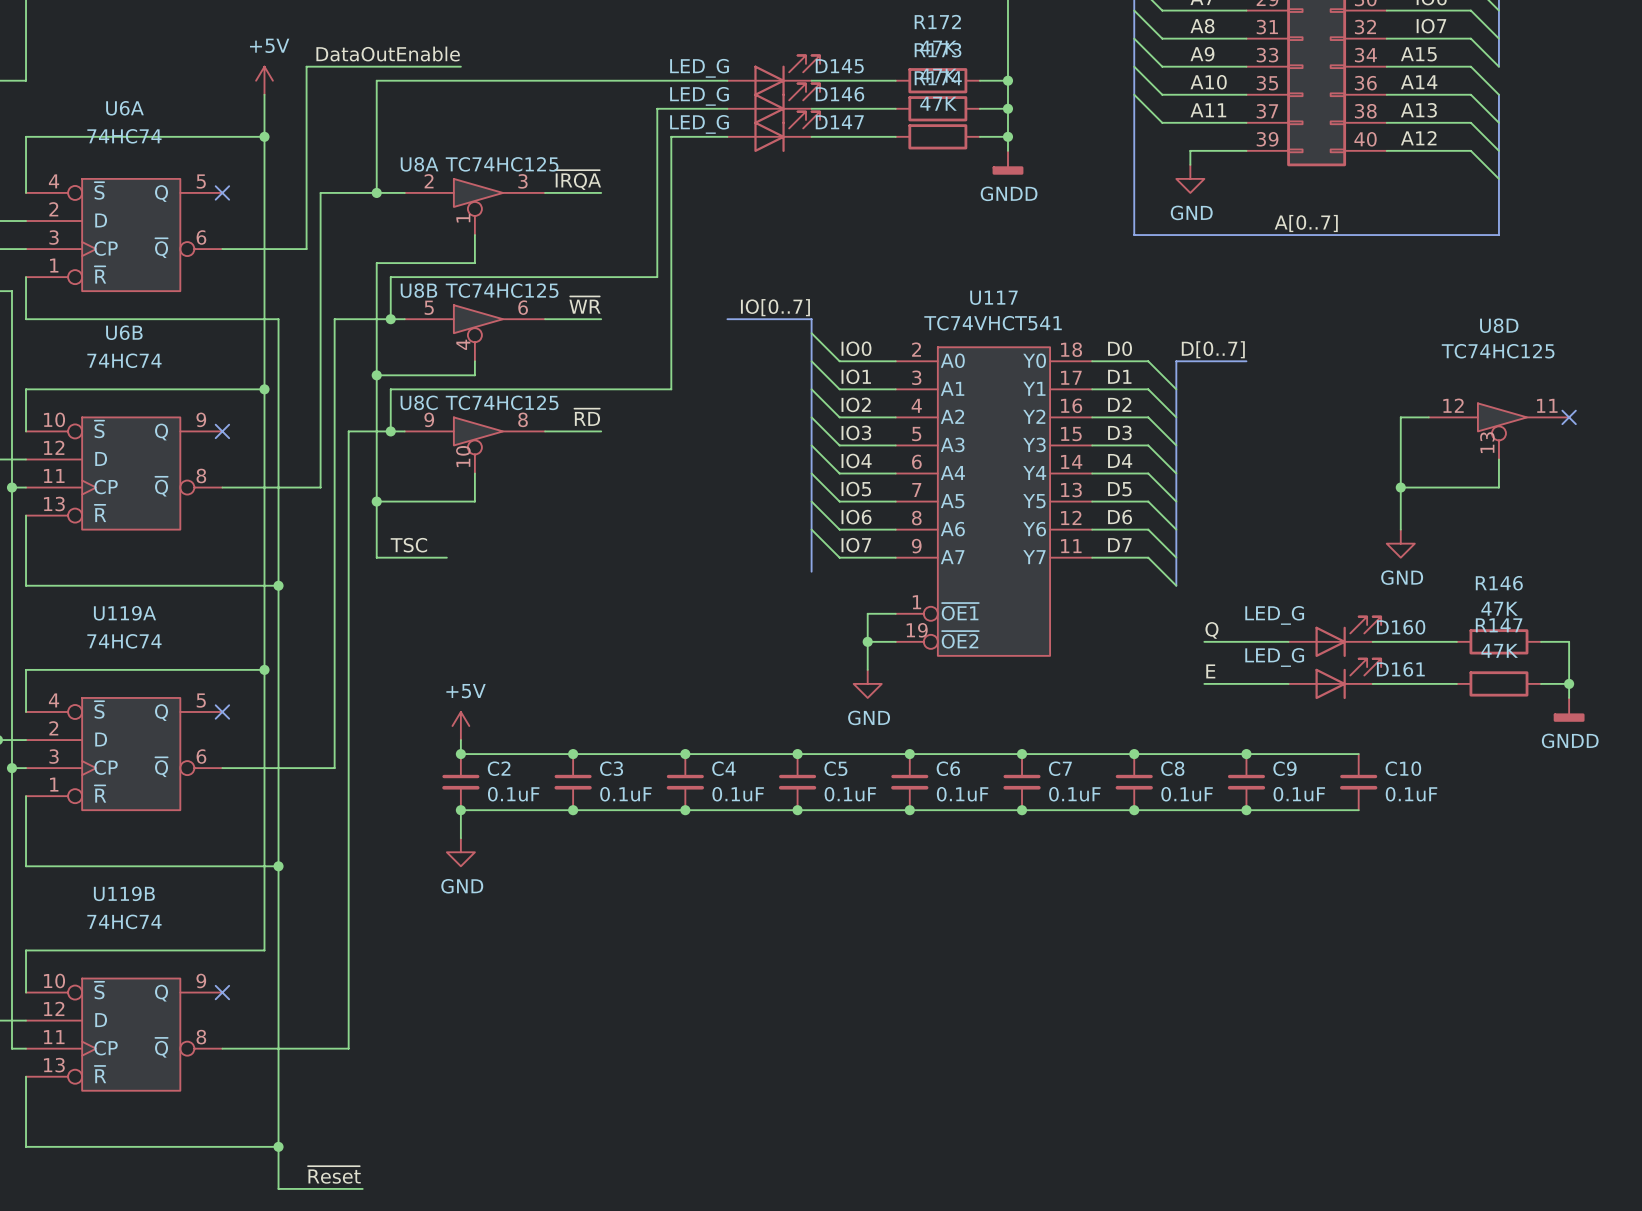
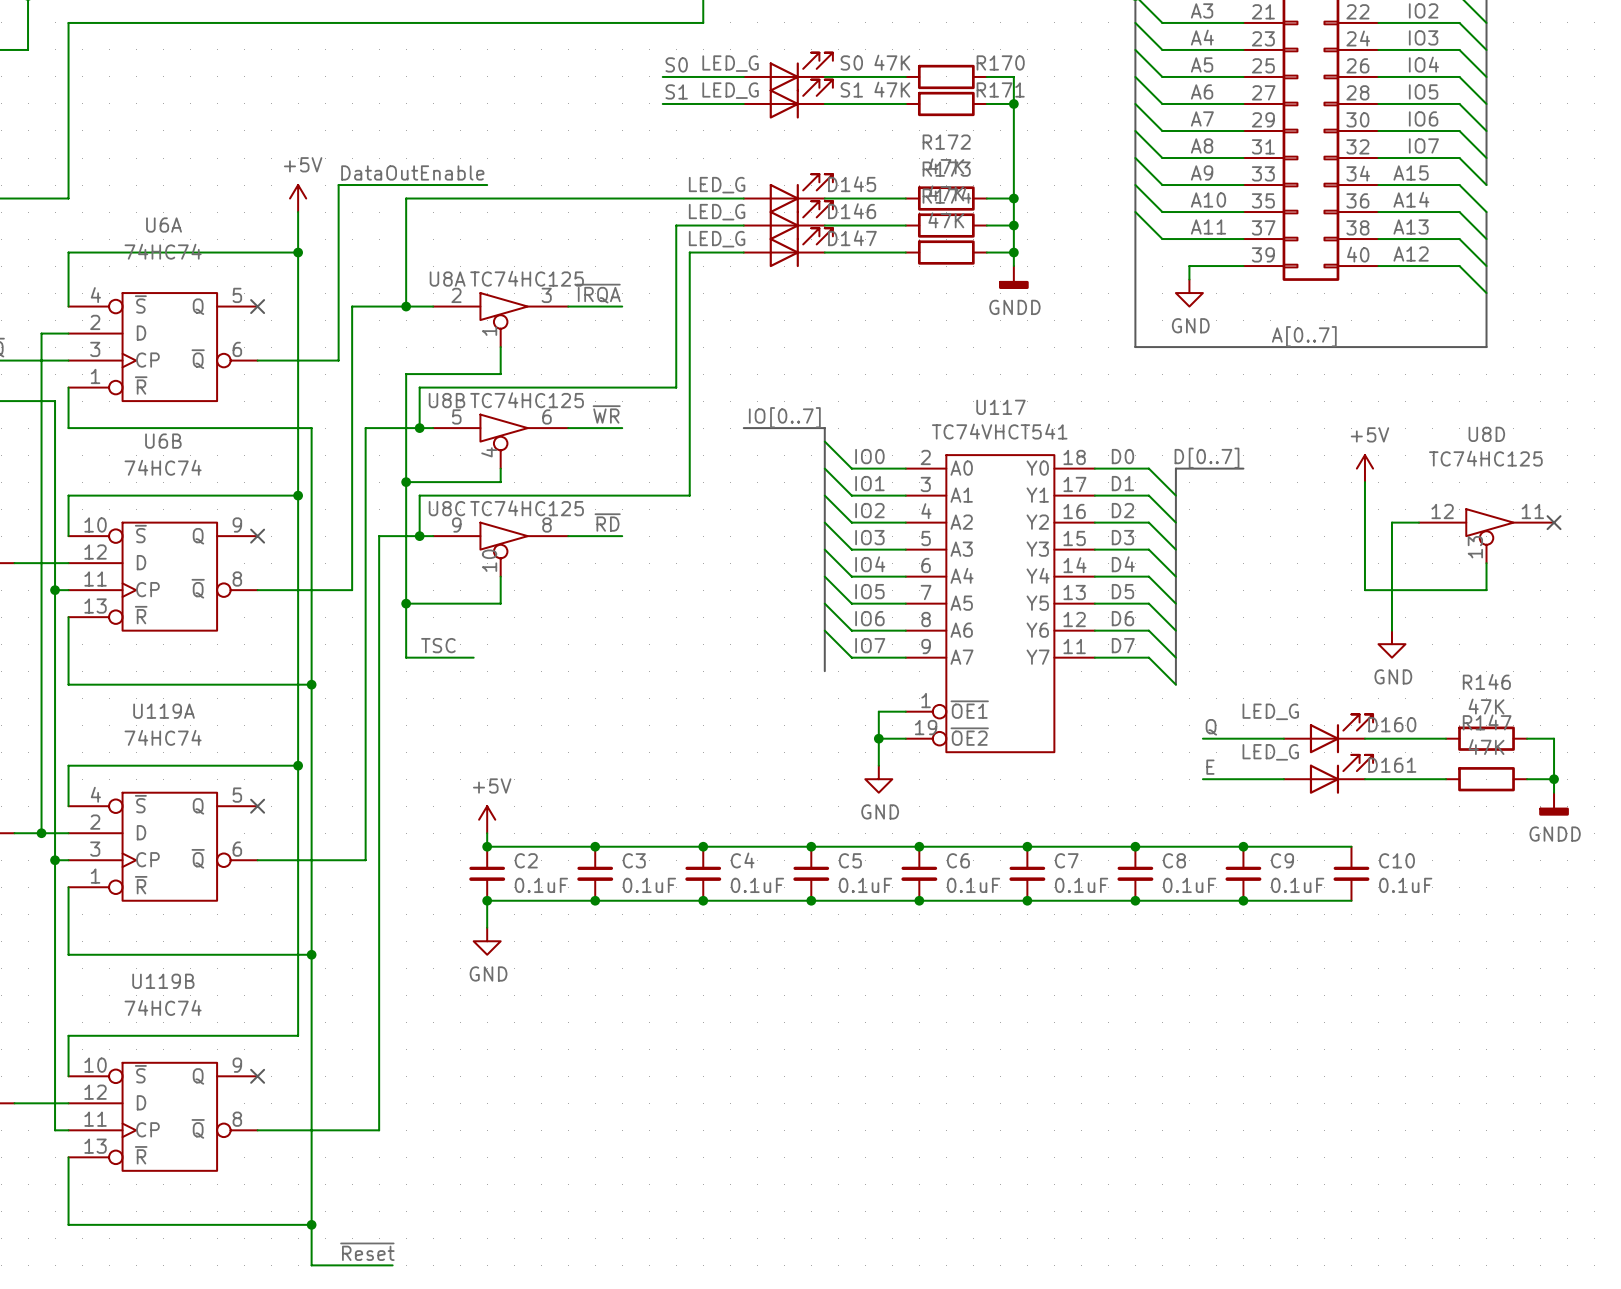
power symbol: none -> +5V (1364, 468)
wire: none -> (1364, 482) (1364, 590) (1391, 590)
junction: (1400, 487) -> none

